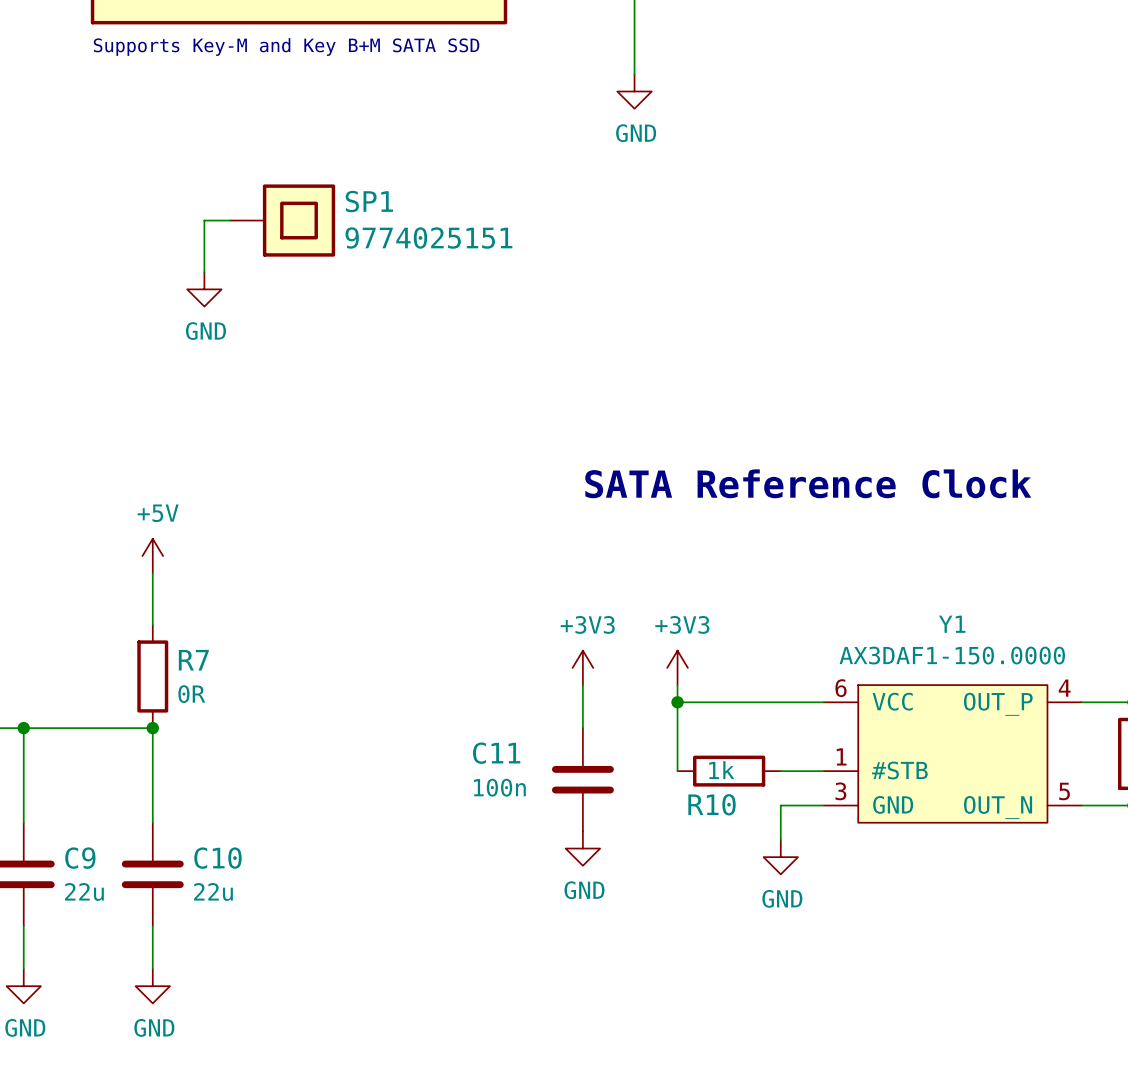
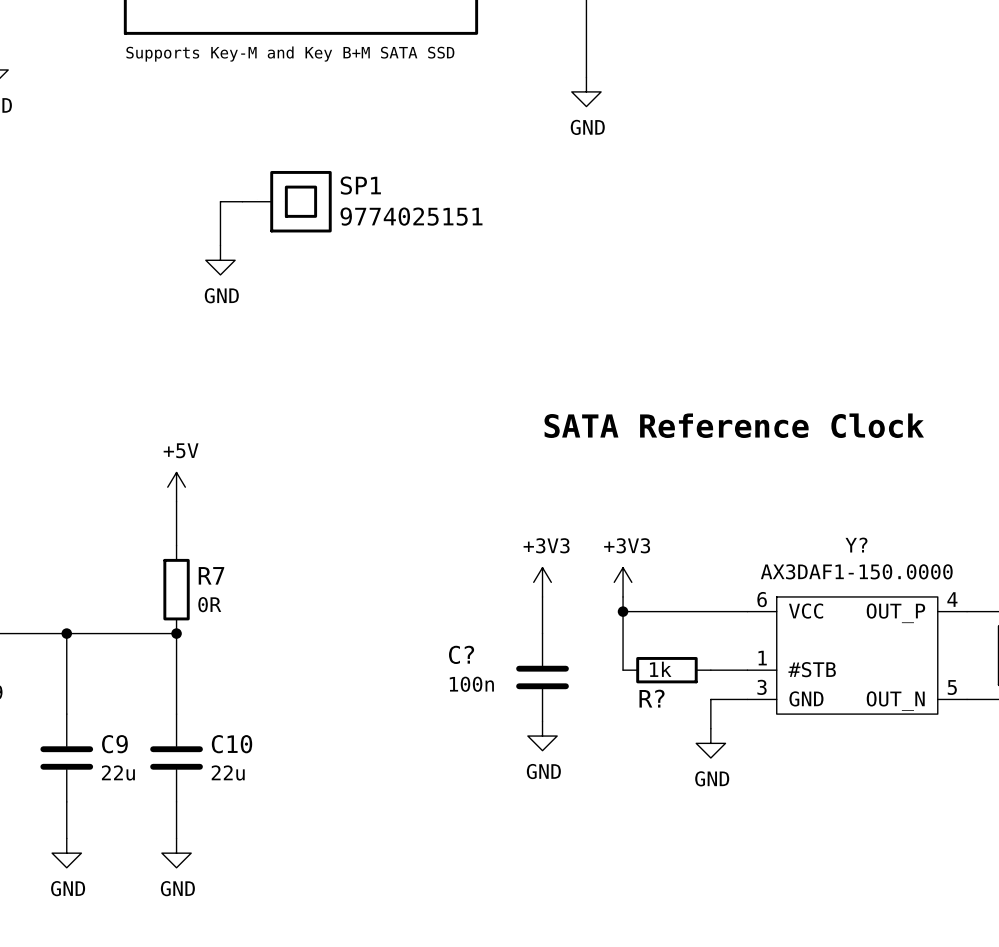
Y1 name: Y1 (952, 624) -> Y? (856, 545)
C11 name: C11 (496, 753) -> C? (461, 654)
R10 name: R10 (712, 804) -> R? (652, 698)

